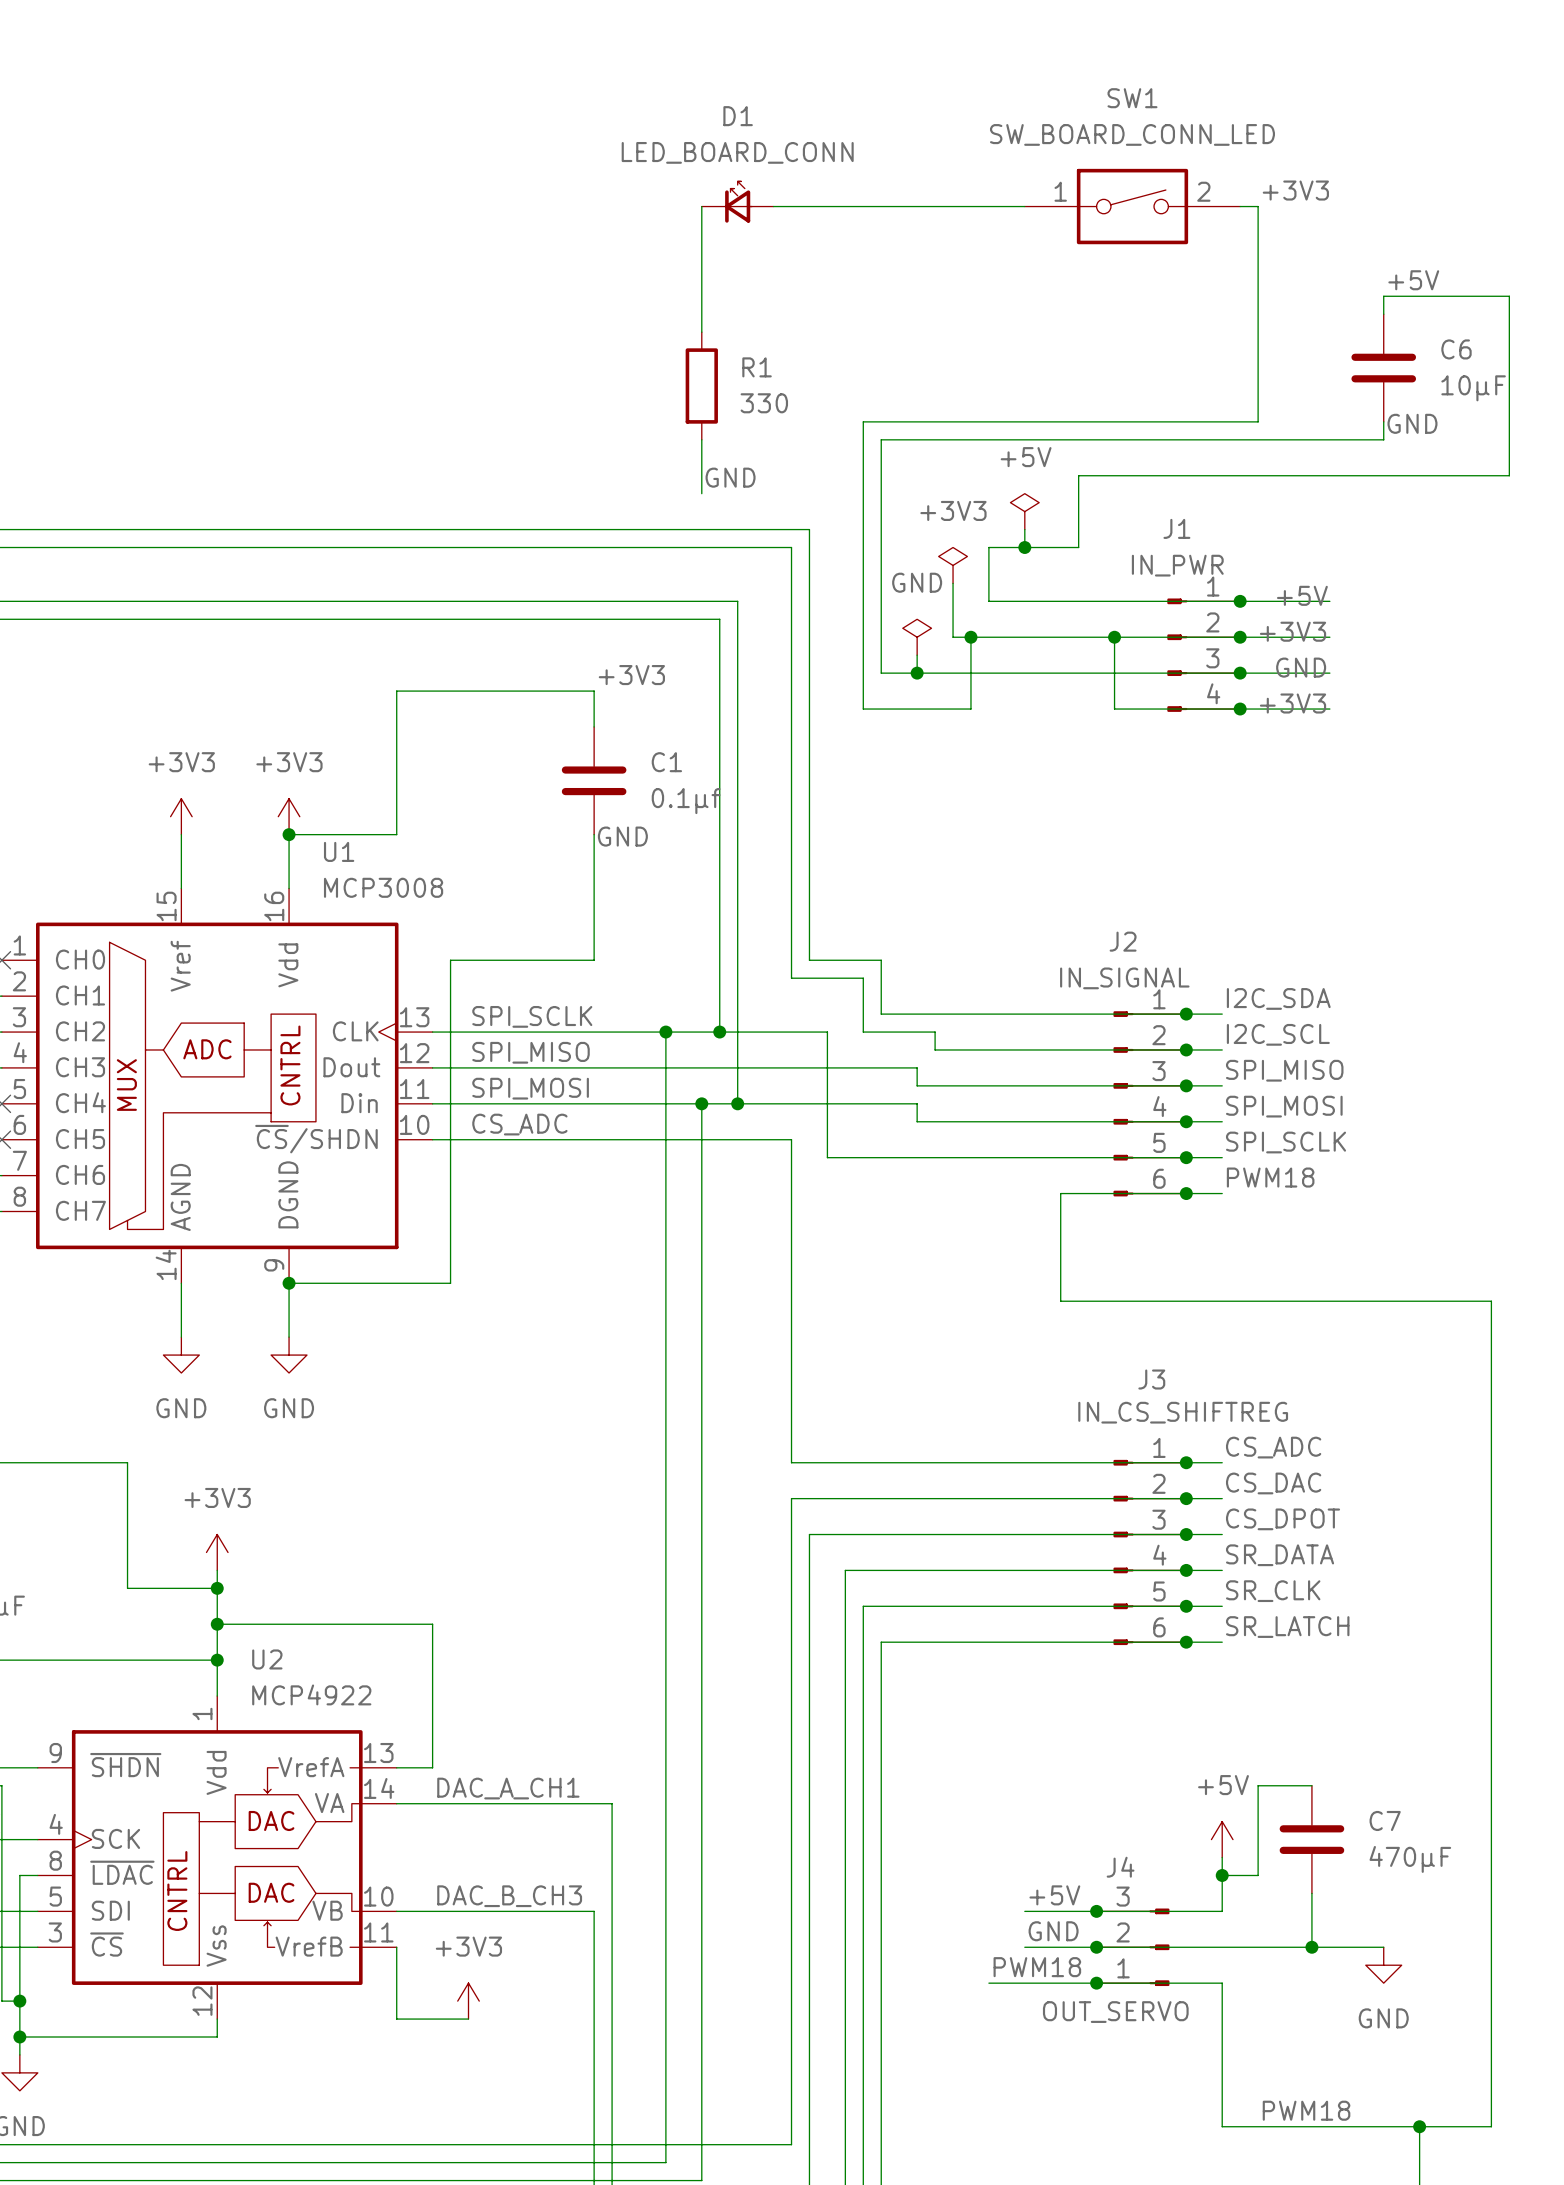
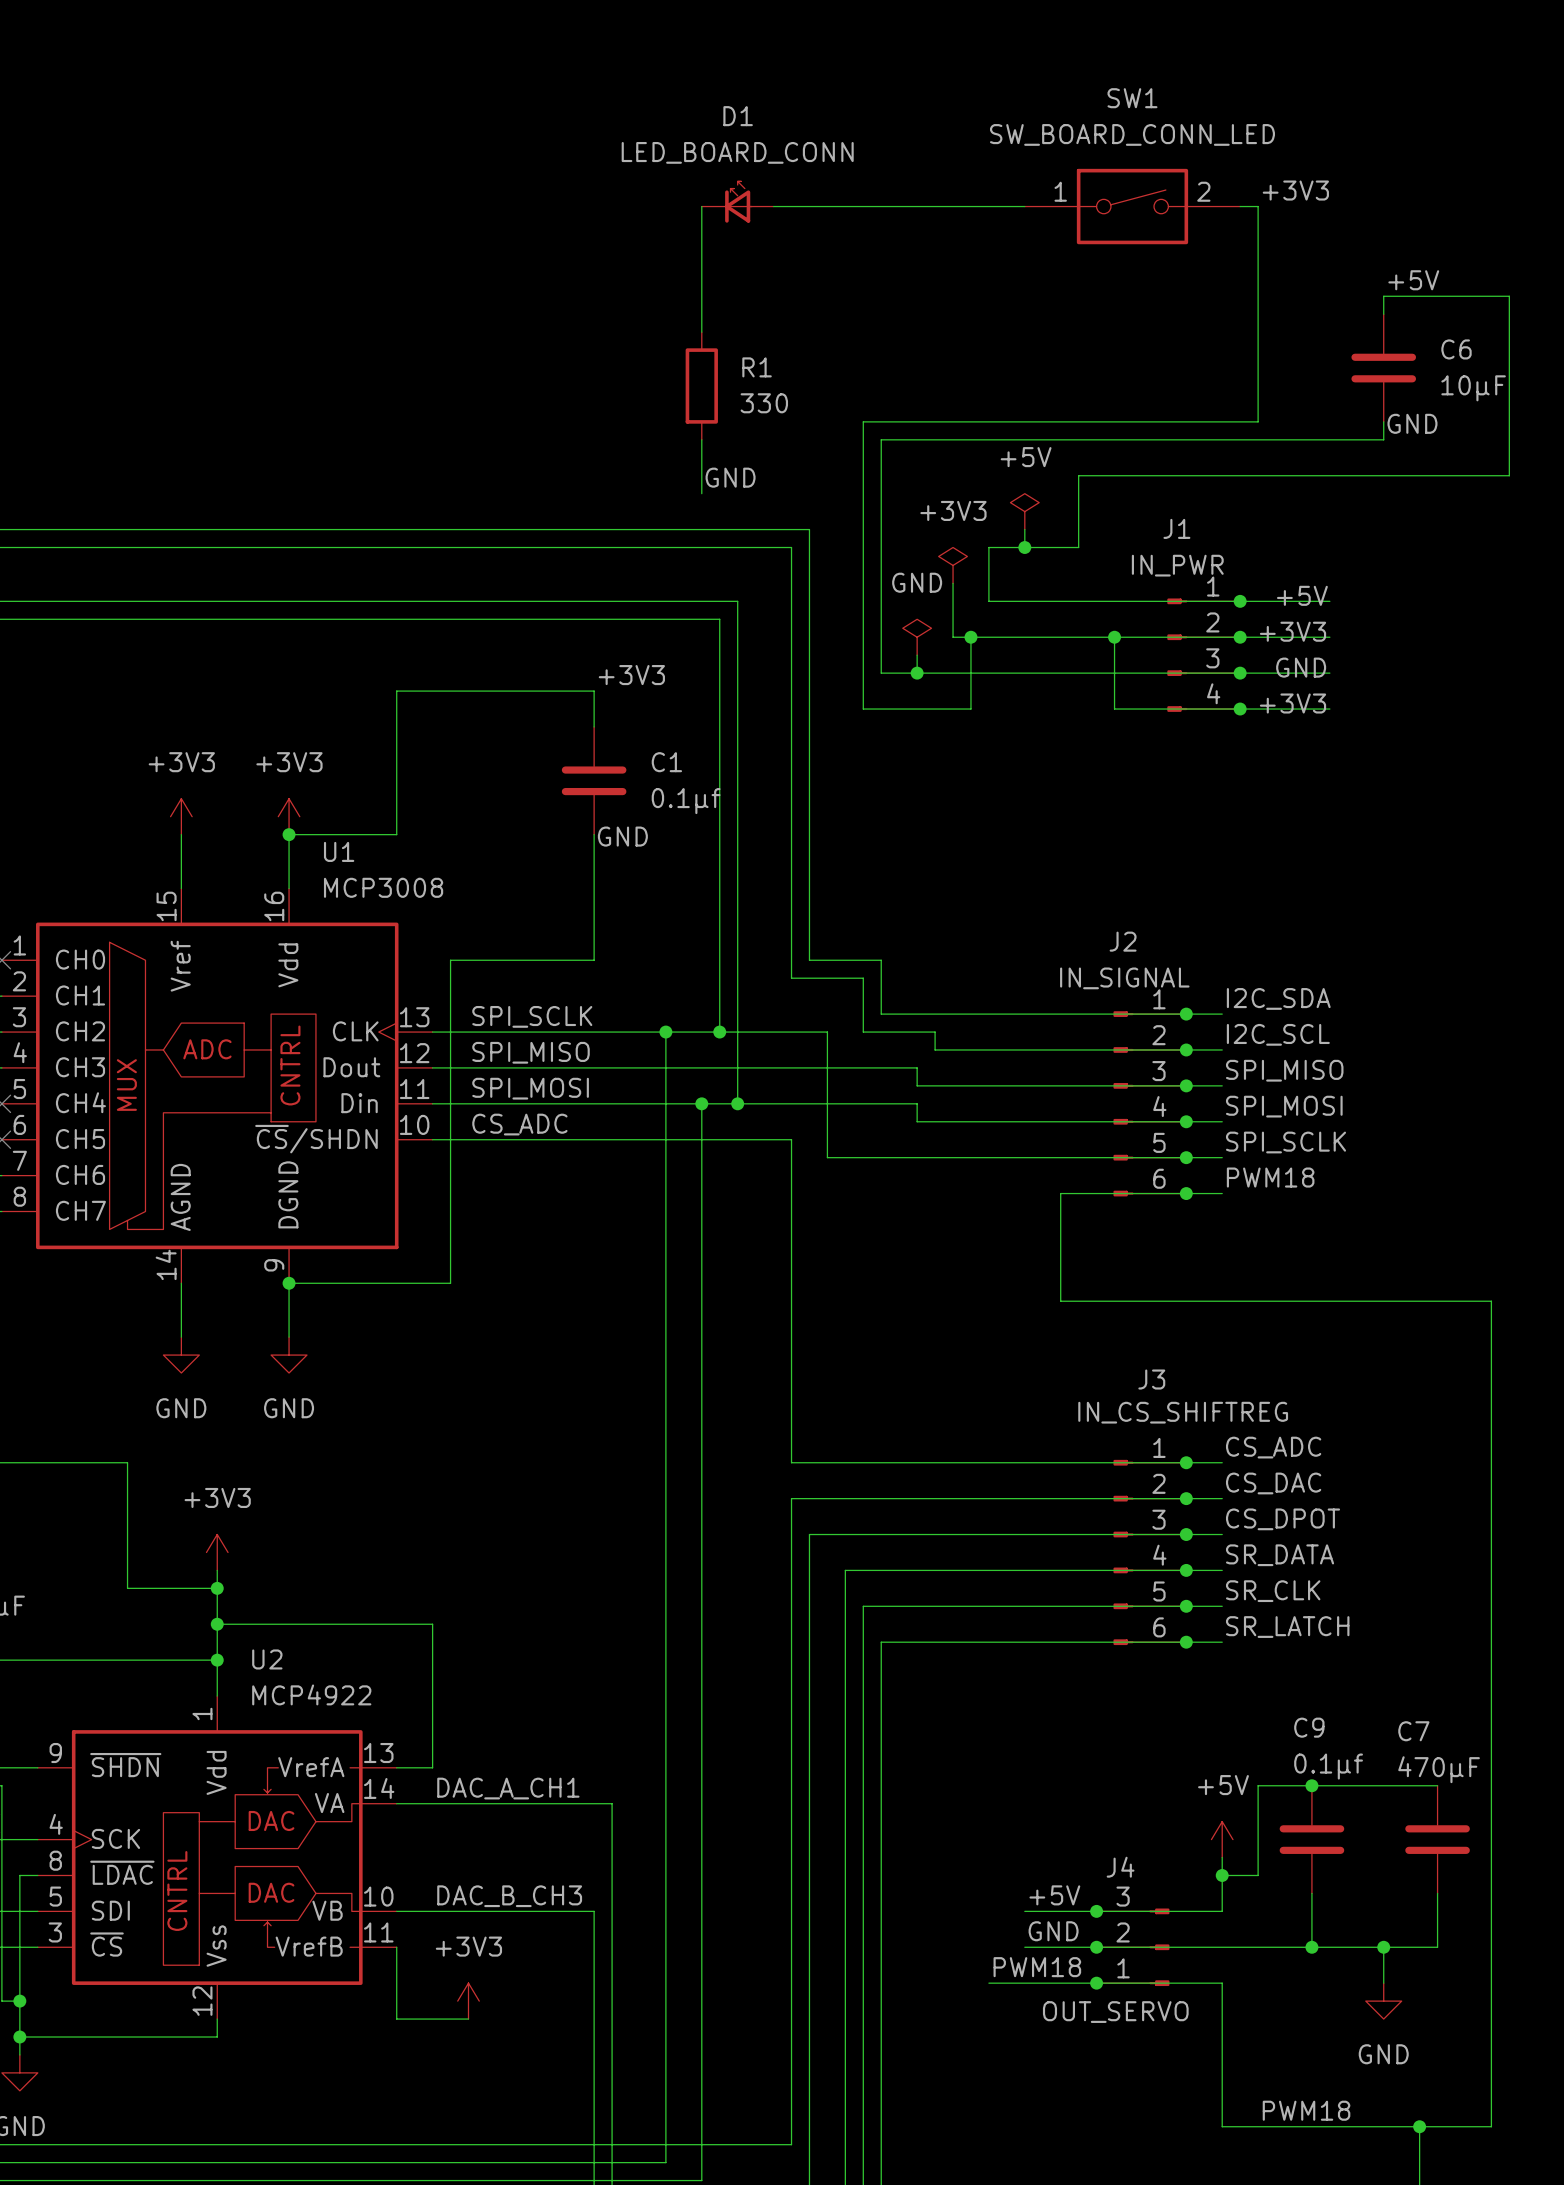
wire: none -> (1311, 1785) (1437, 1785)
junction: none -> (1311, 1785)
C7 name: C7 (1385, 1820) -> C9 (1309, 1727)
C7: none -> 470µF (1437, 1839)
C7 value: 470µF (1410, 1859) -> 0.1µf (1328, 1766)
wire: none -> (1437, 1893) (1437, 1947) (1383, 1947) (1383, 1983)
junction: none -> (1383, 1947)
power symbol position: GND (1383, 1965) -> GND (1383, 2001)

